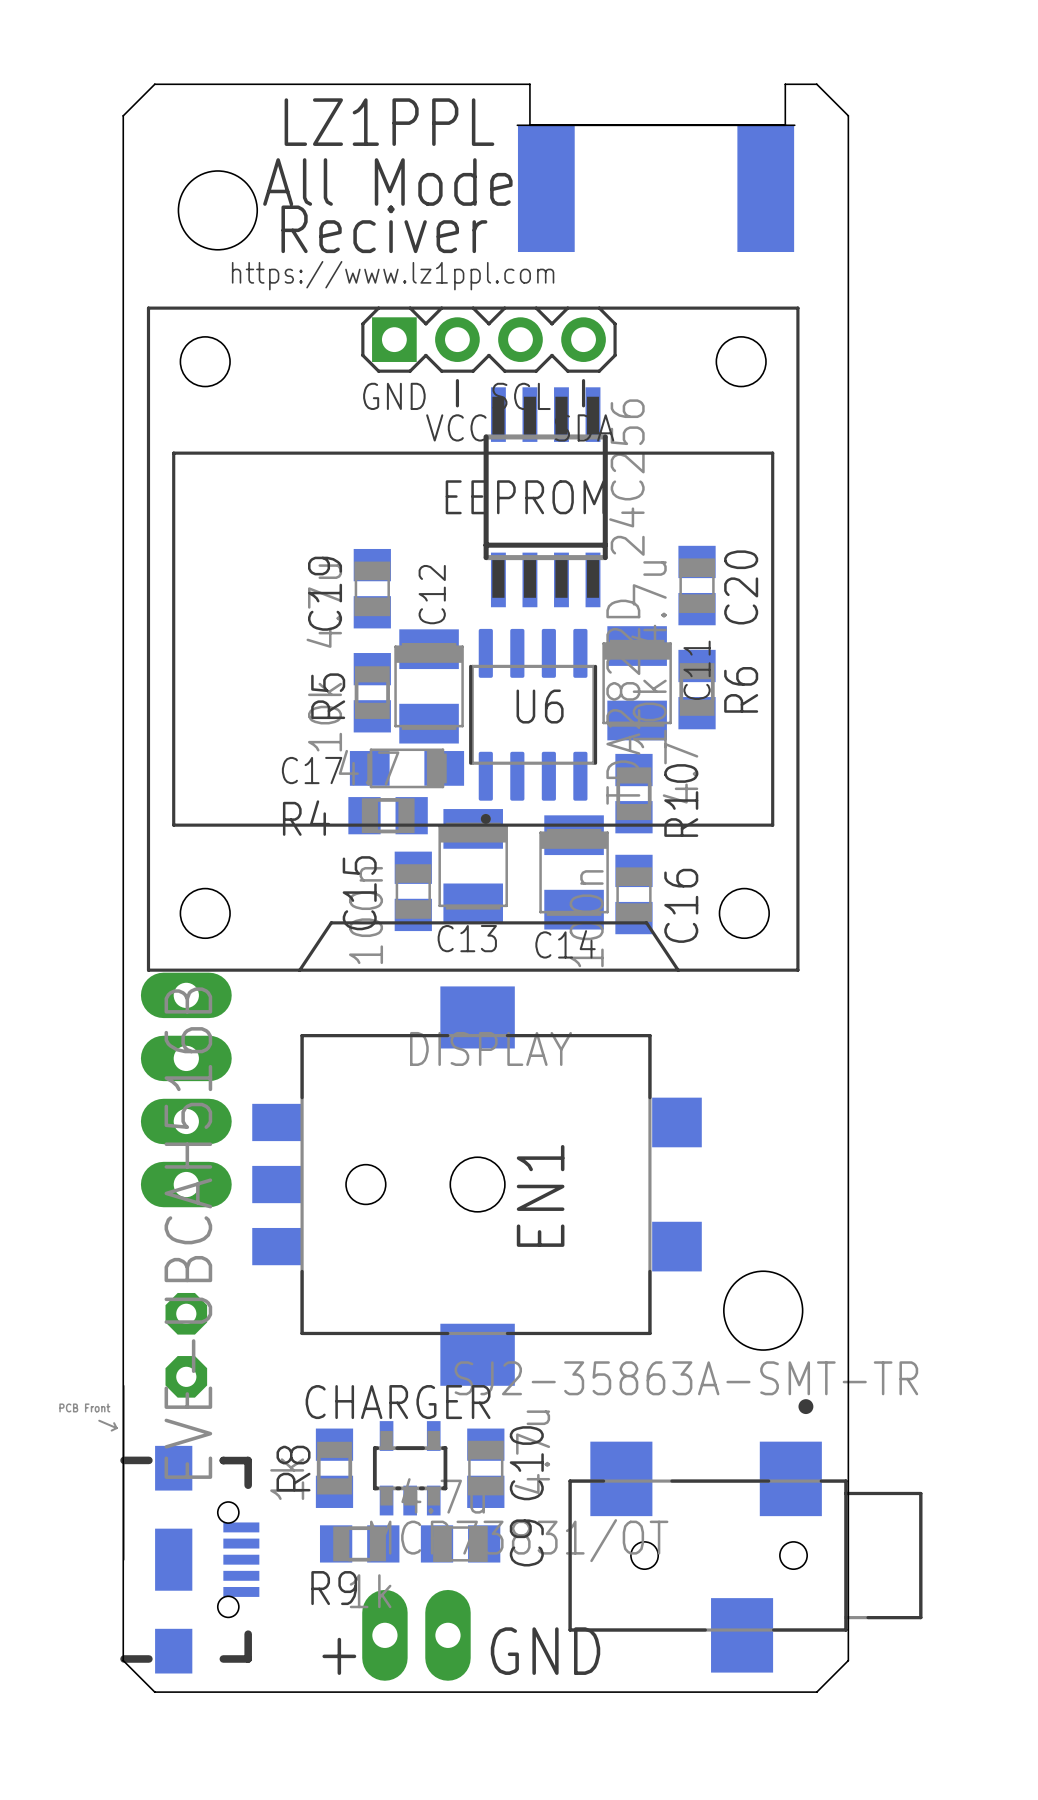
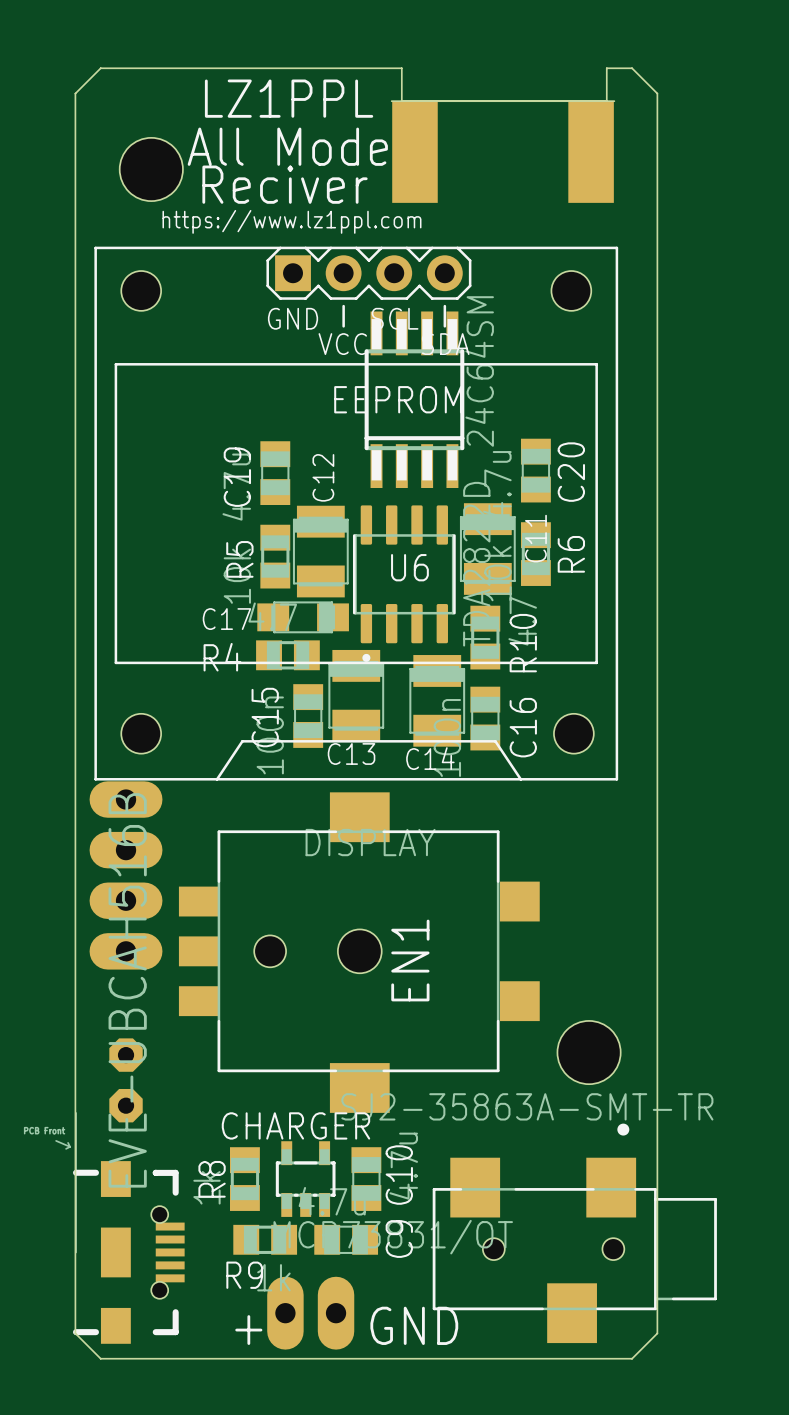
EEPROM value: 24C256 (626, 477) -> 24C64SM (479, 371)

